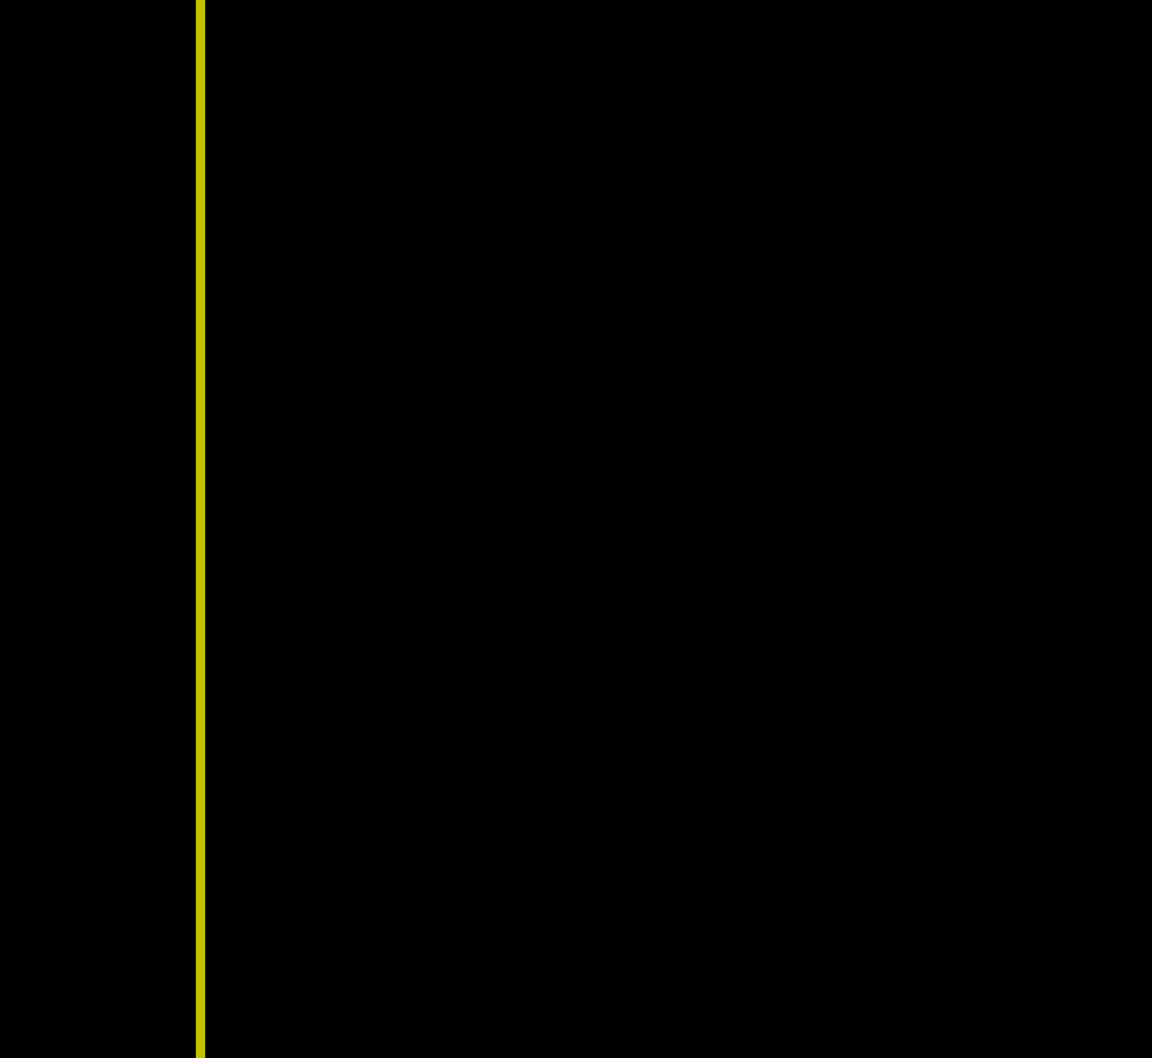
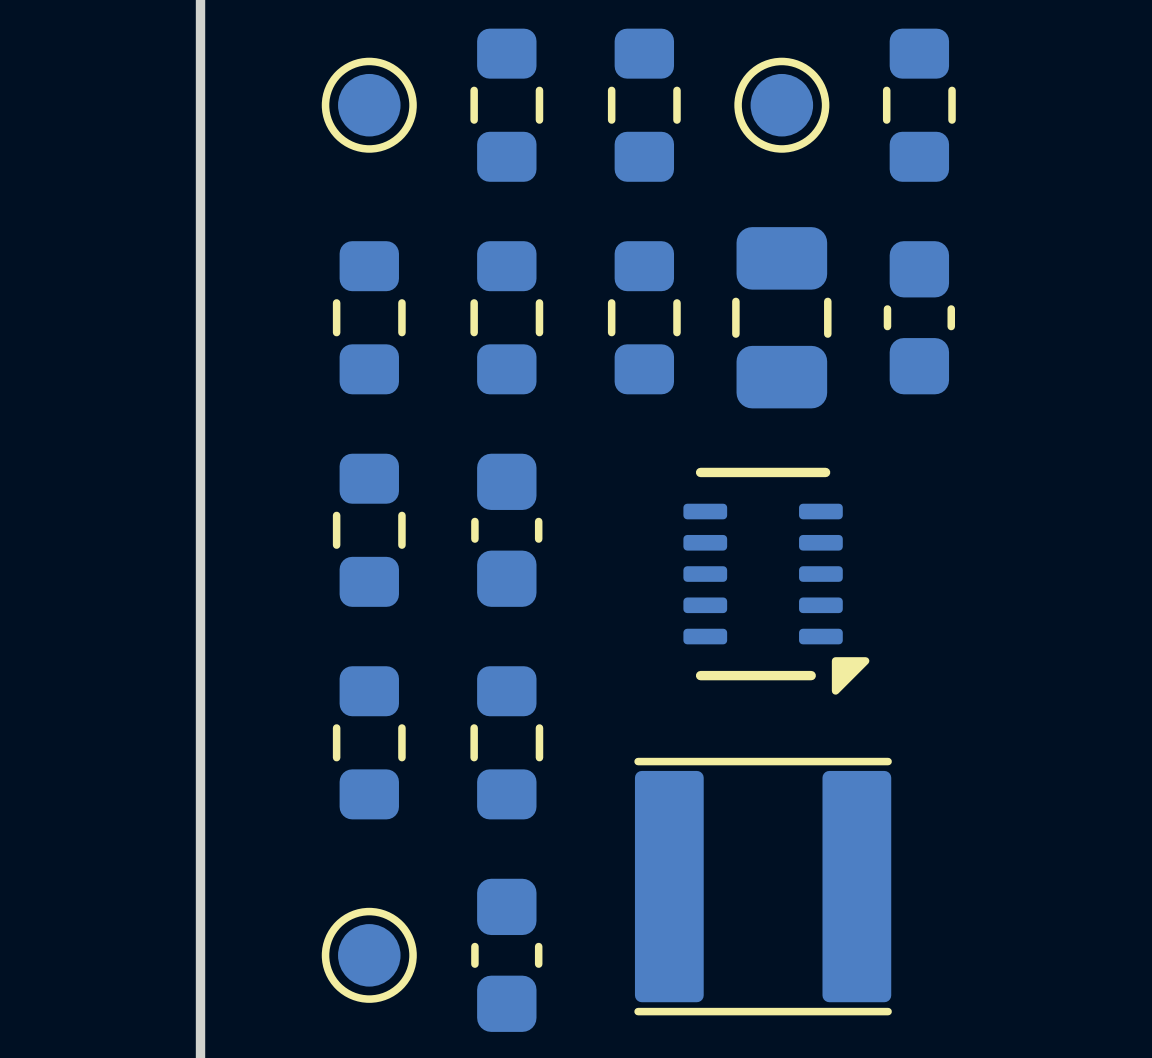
part: none -> (369, 105)
part: none -> (506, 105)
part: none -> (644, 105)
part: none -> (781, 105)
part: none -> (919, 105)
part: none -> (369, 317)
part: none -> (506, 317)
part: none -> (644, 317)
part: none -> (781, 317)
part: none -> (919, 317)
part: none -> (369, 530)
part: none -> (506, 530)
part: none -> (776, 581)
part: none -> (369, 742)
part: none -> (506, 742)
part: none -> (763, 886)
part: none -> (369, 955)
part: none -> (506, 955)

